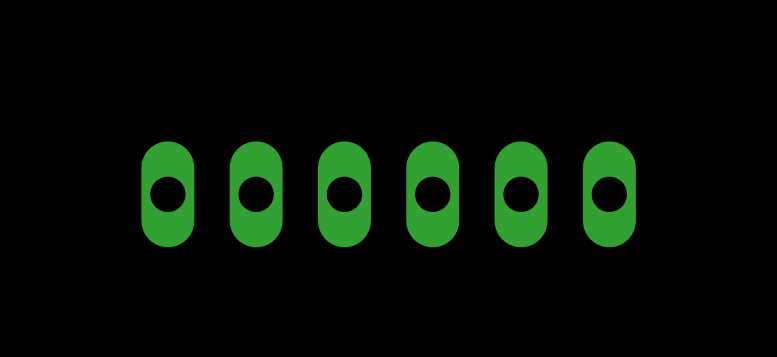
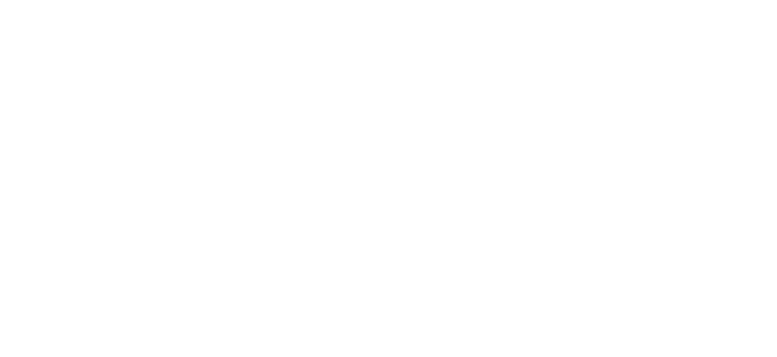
part: (388, 194) -> none

